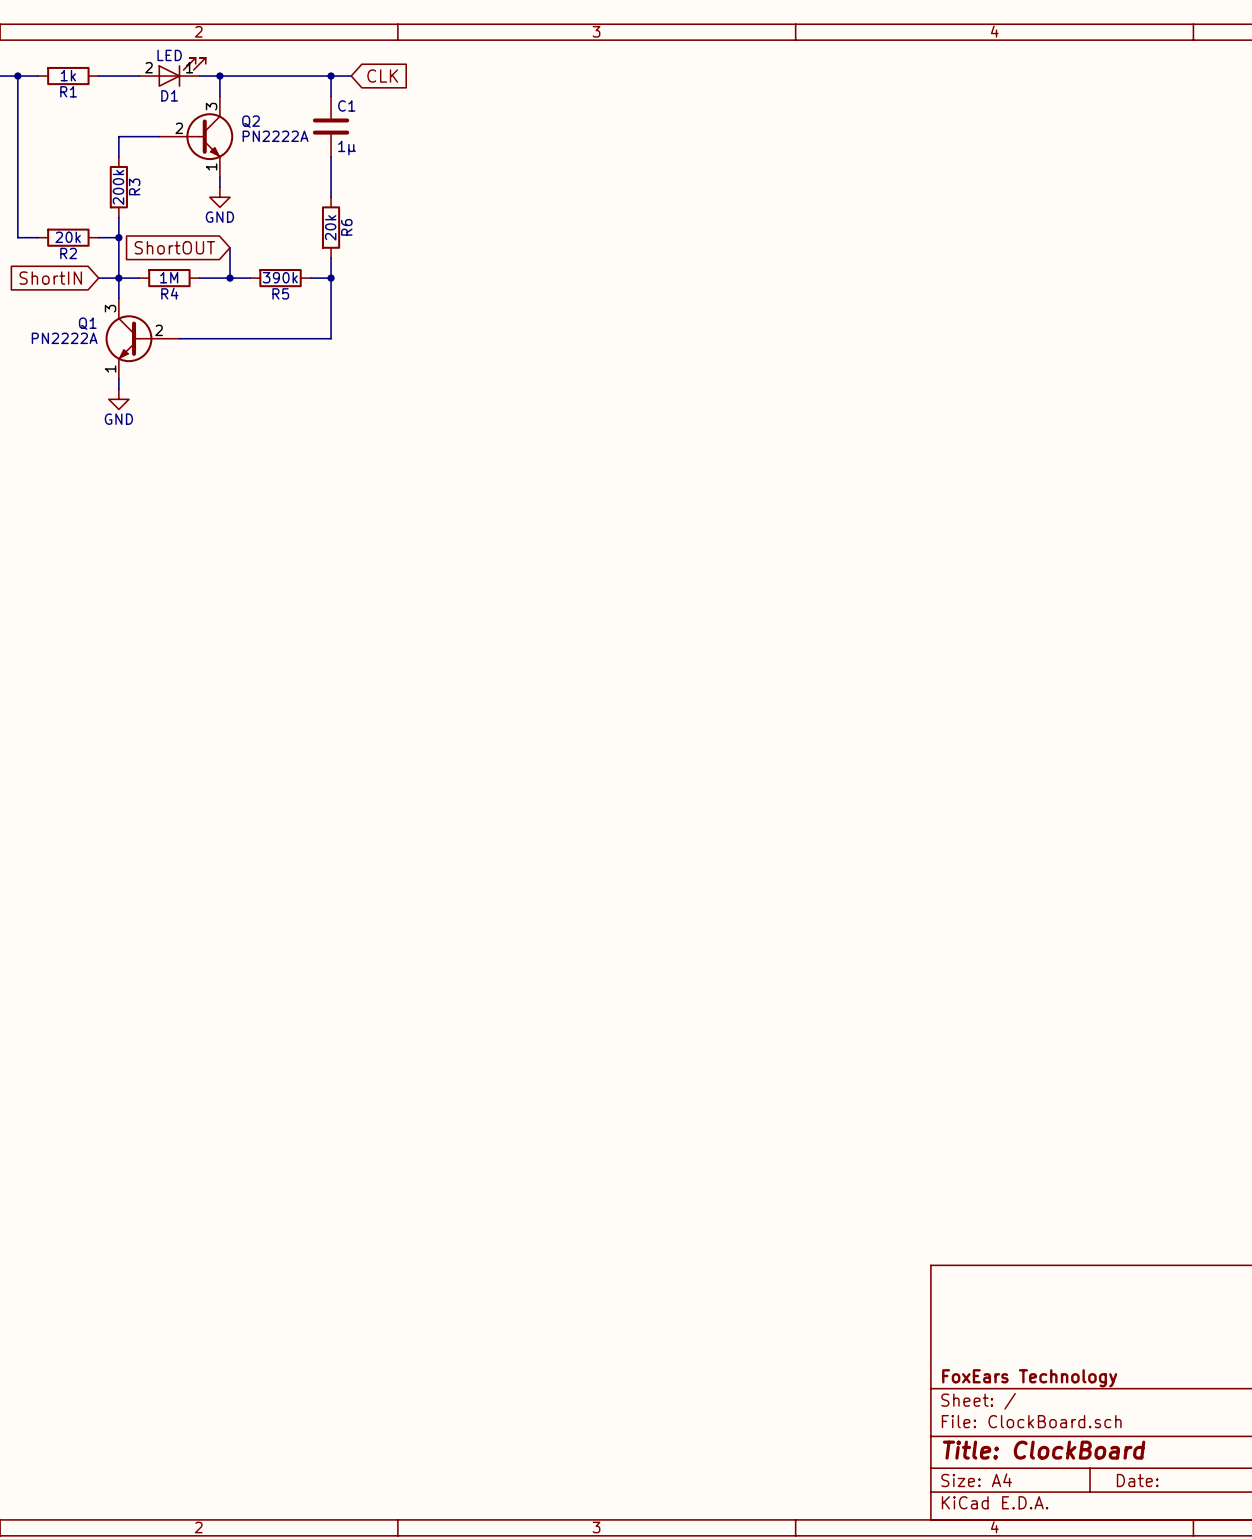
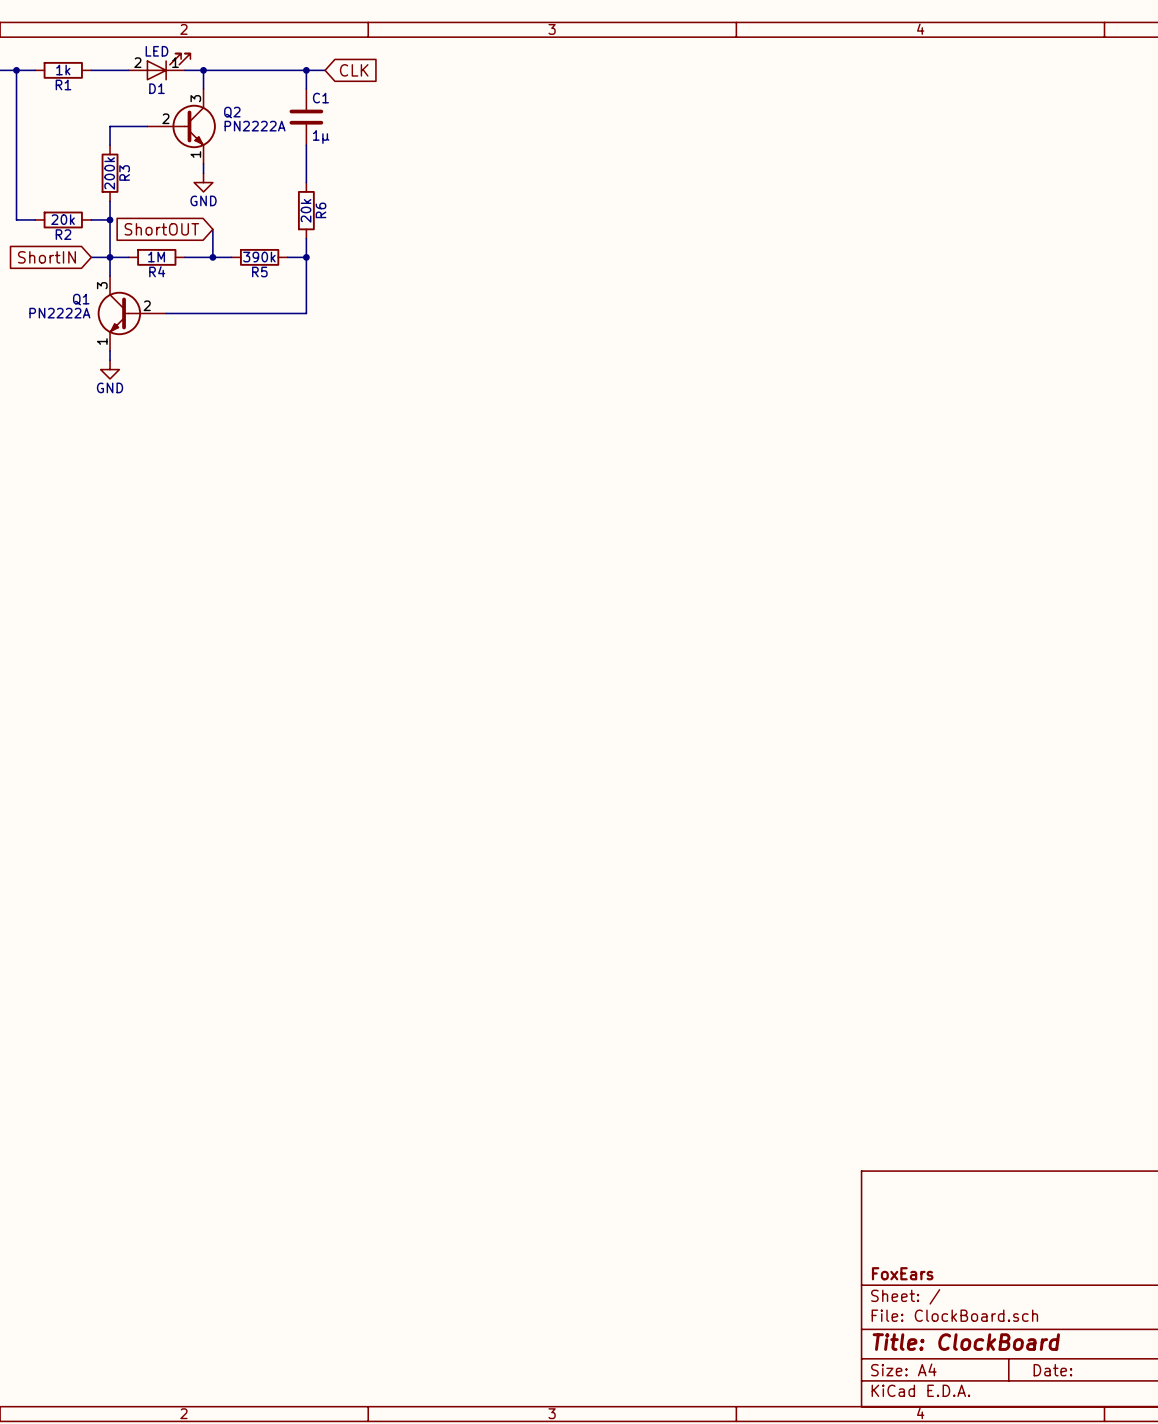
title block: FoxEars Technology (1029, 1378) -> FoxEars (902, 1273)

